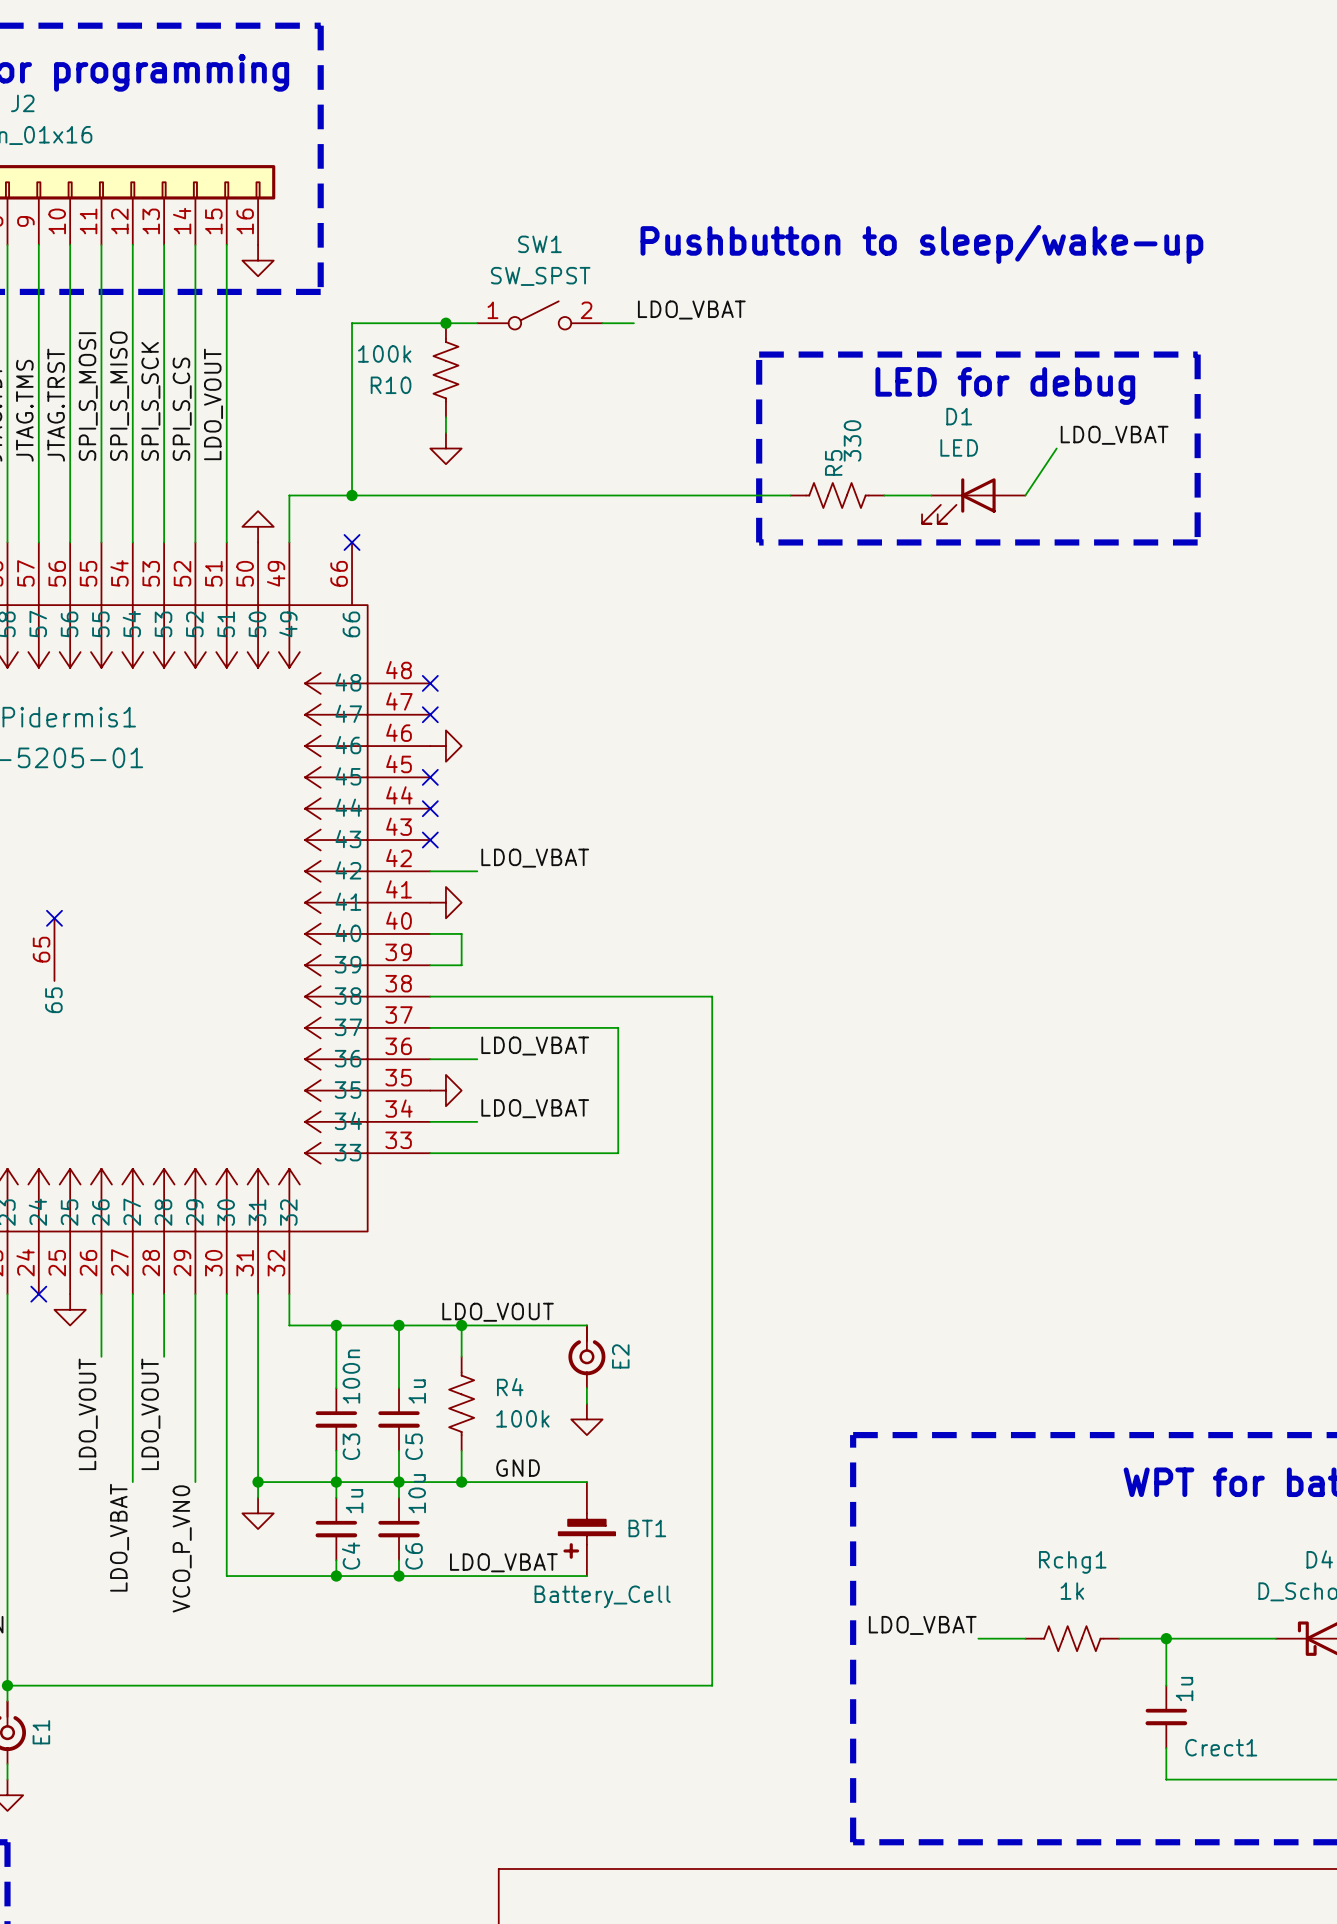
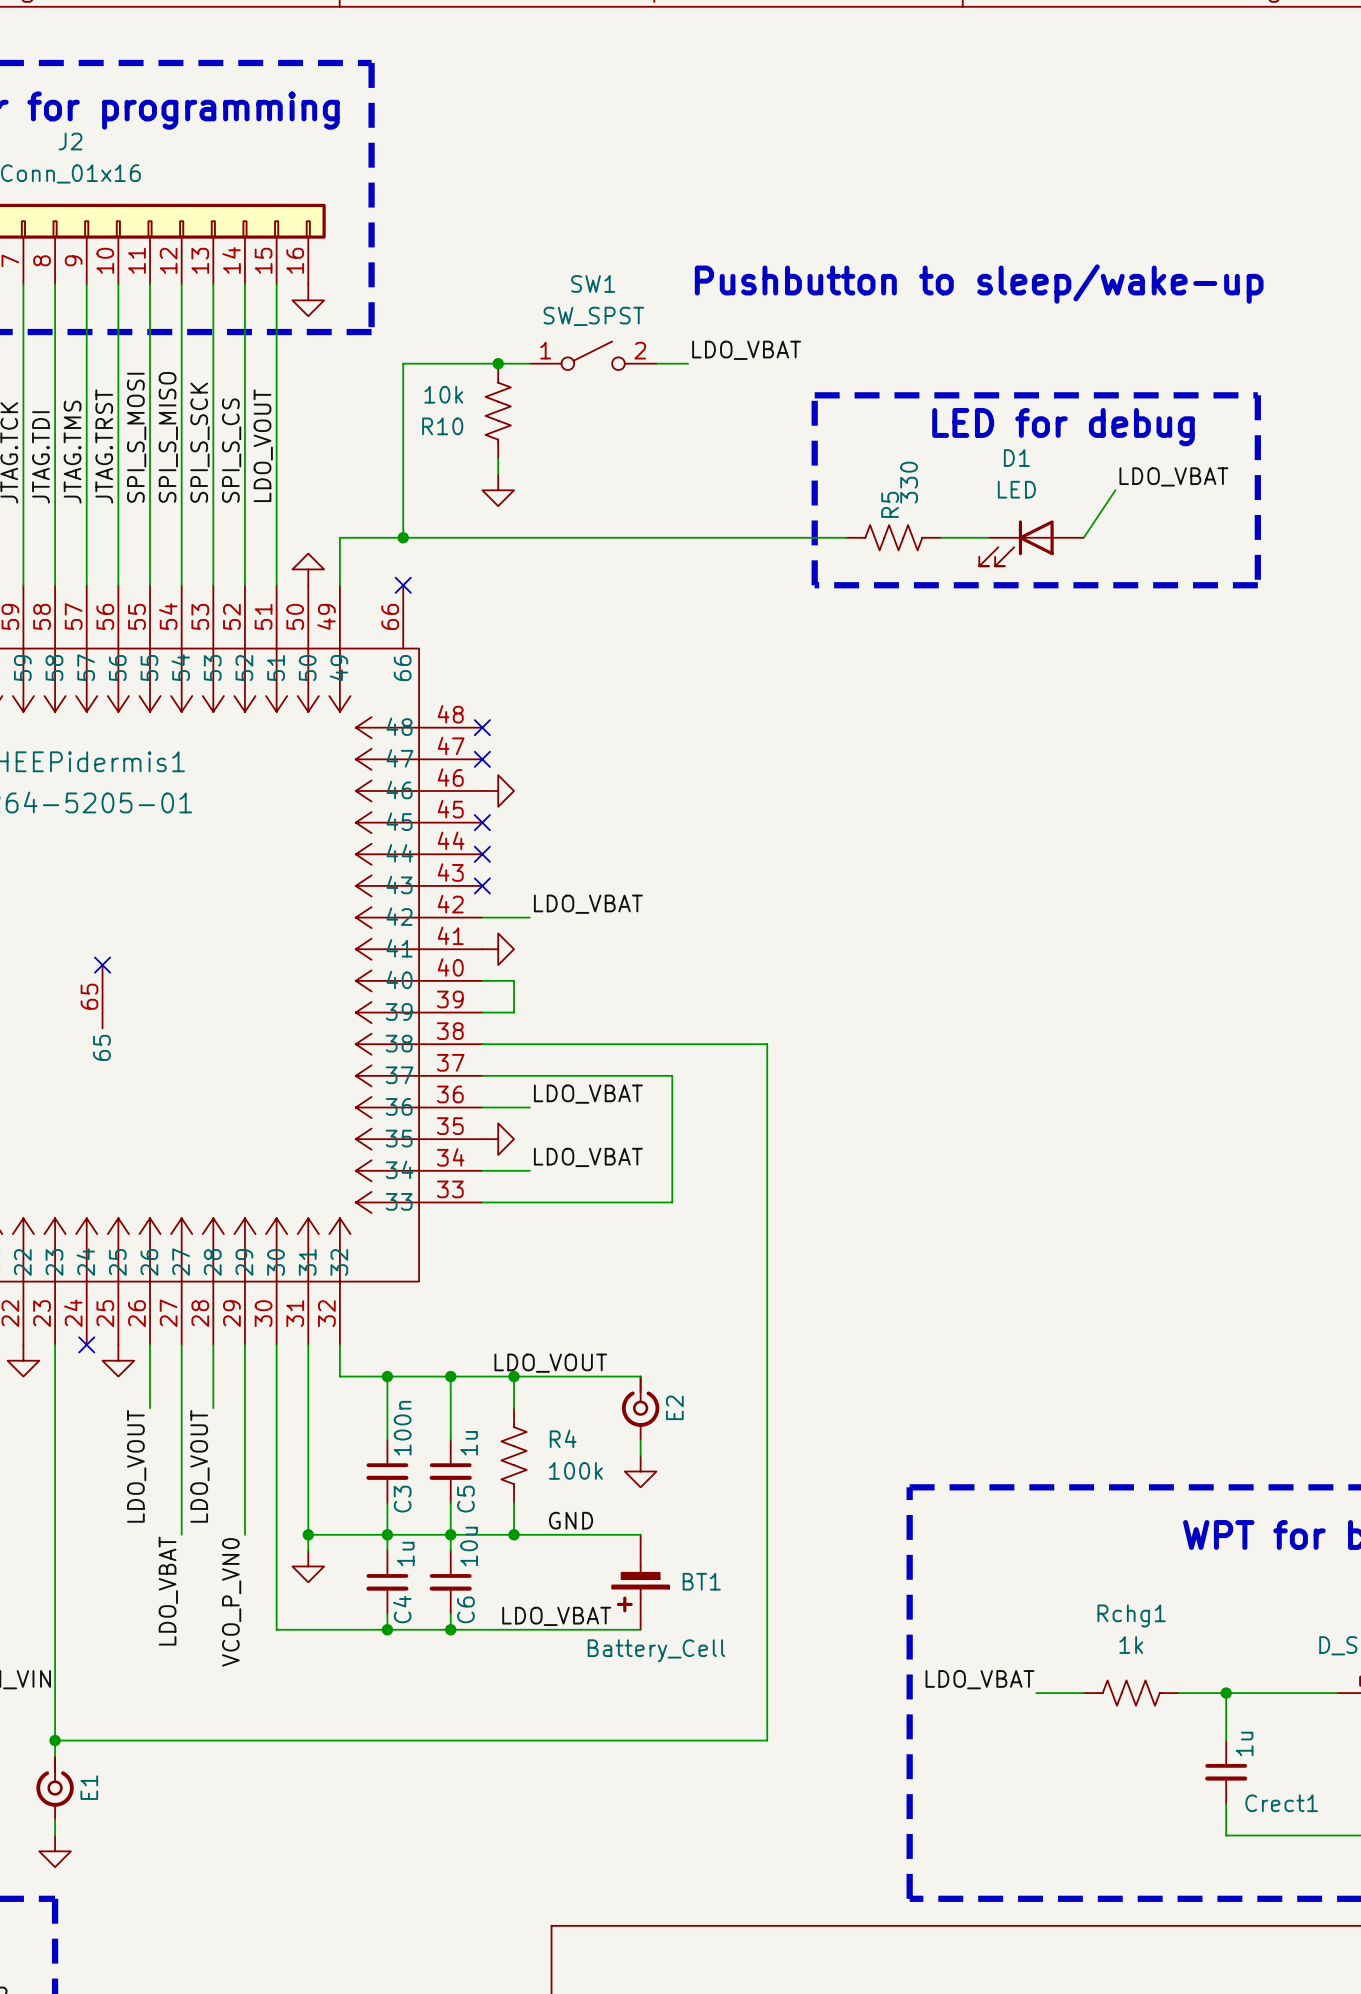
R10 value: 100k (384, 353) -> 10k (443, 394)

